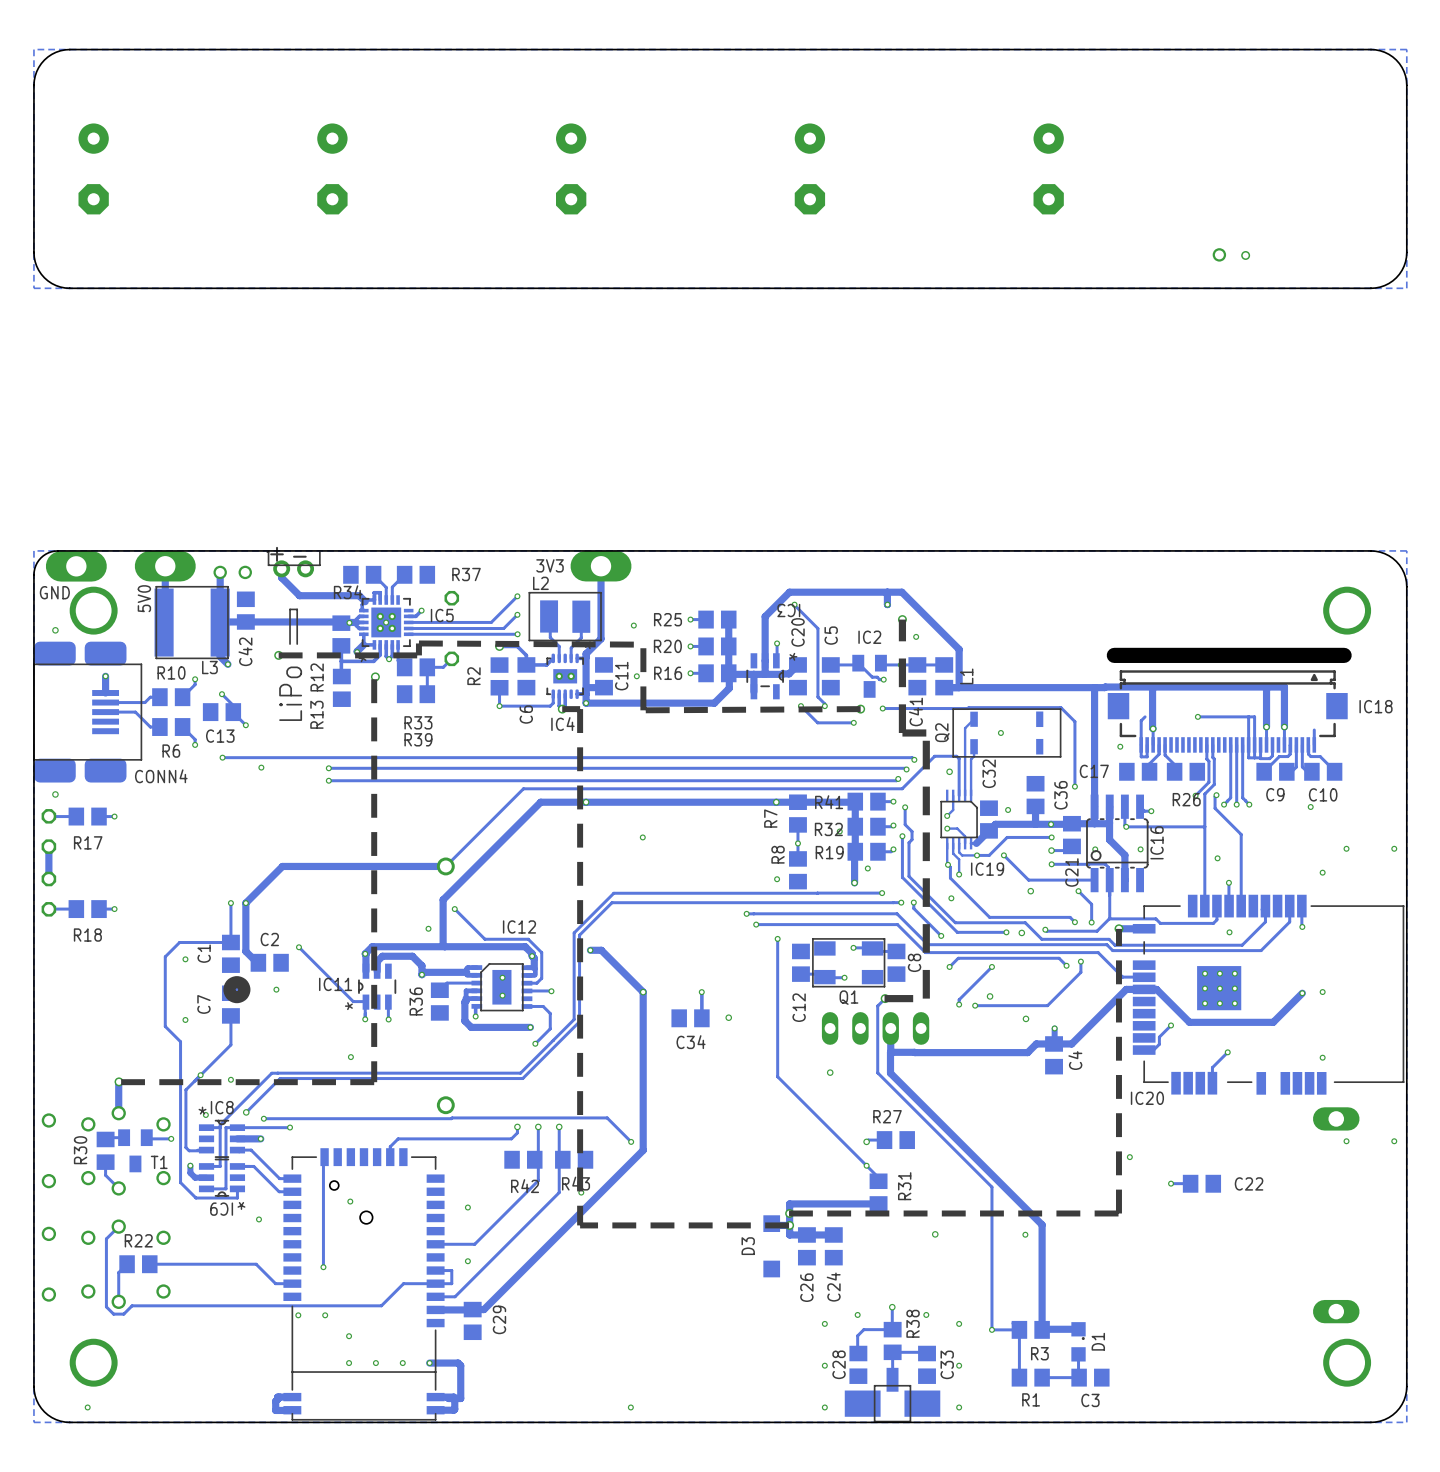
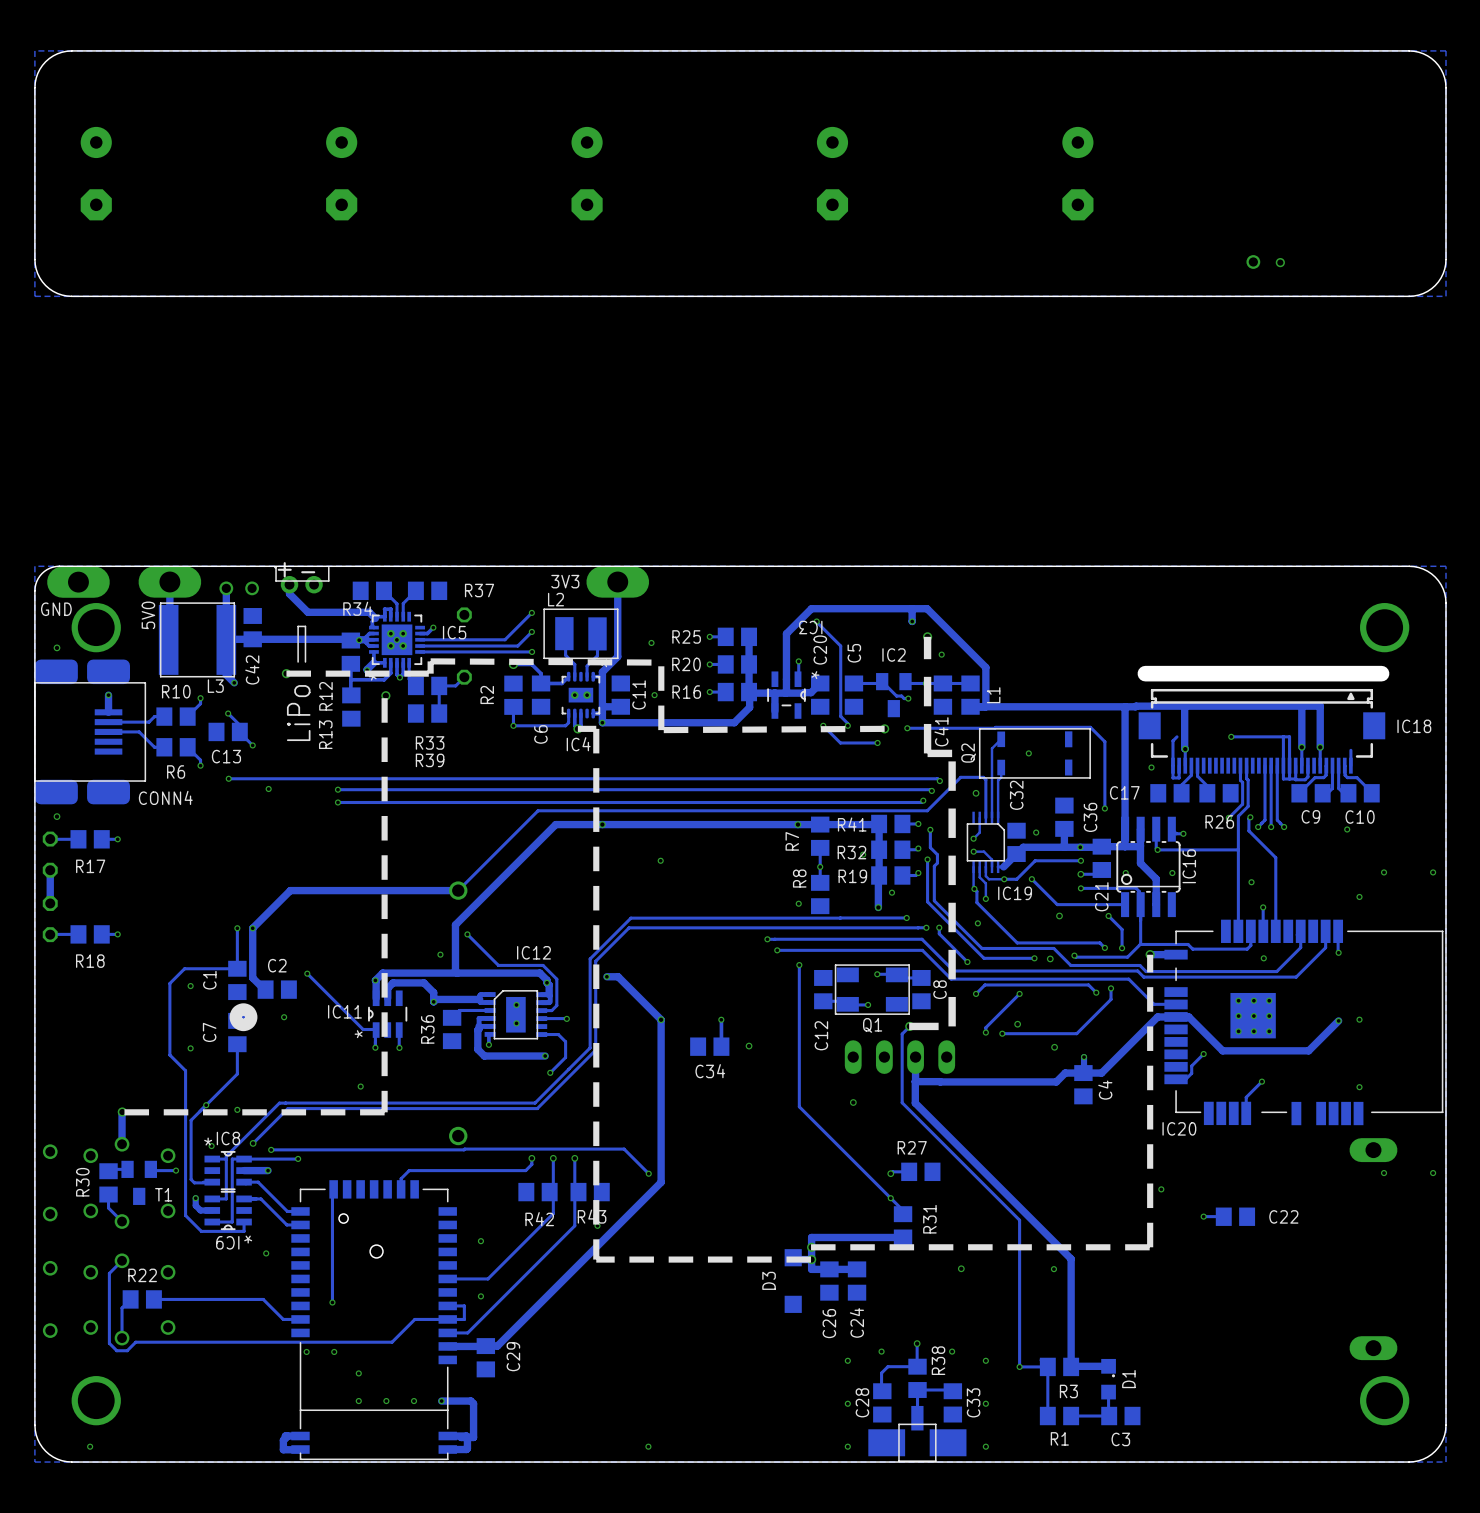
via: (350, 1201) -> none

